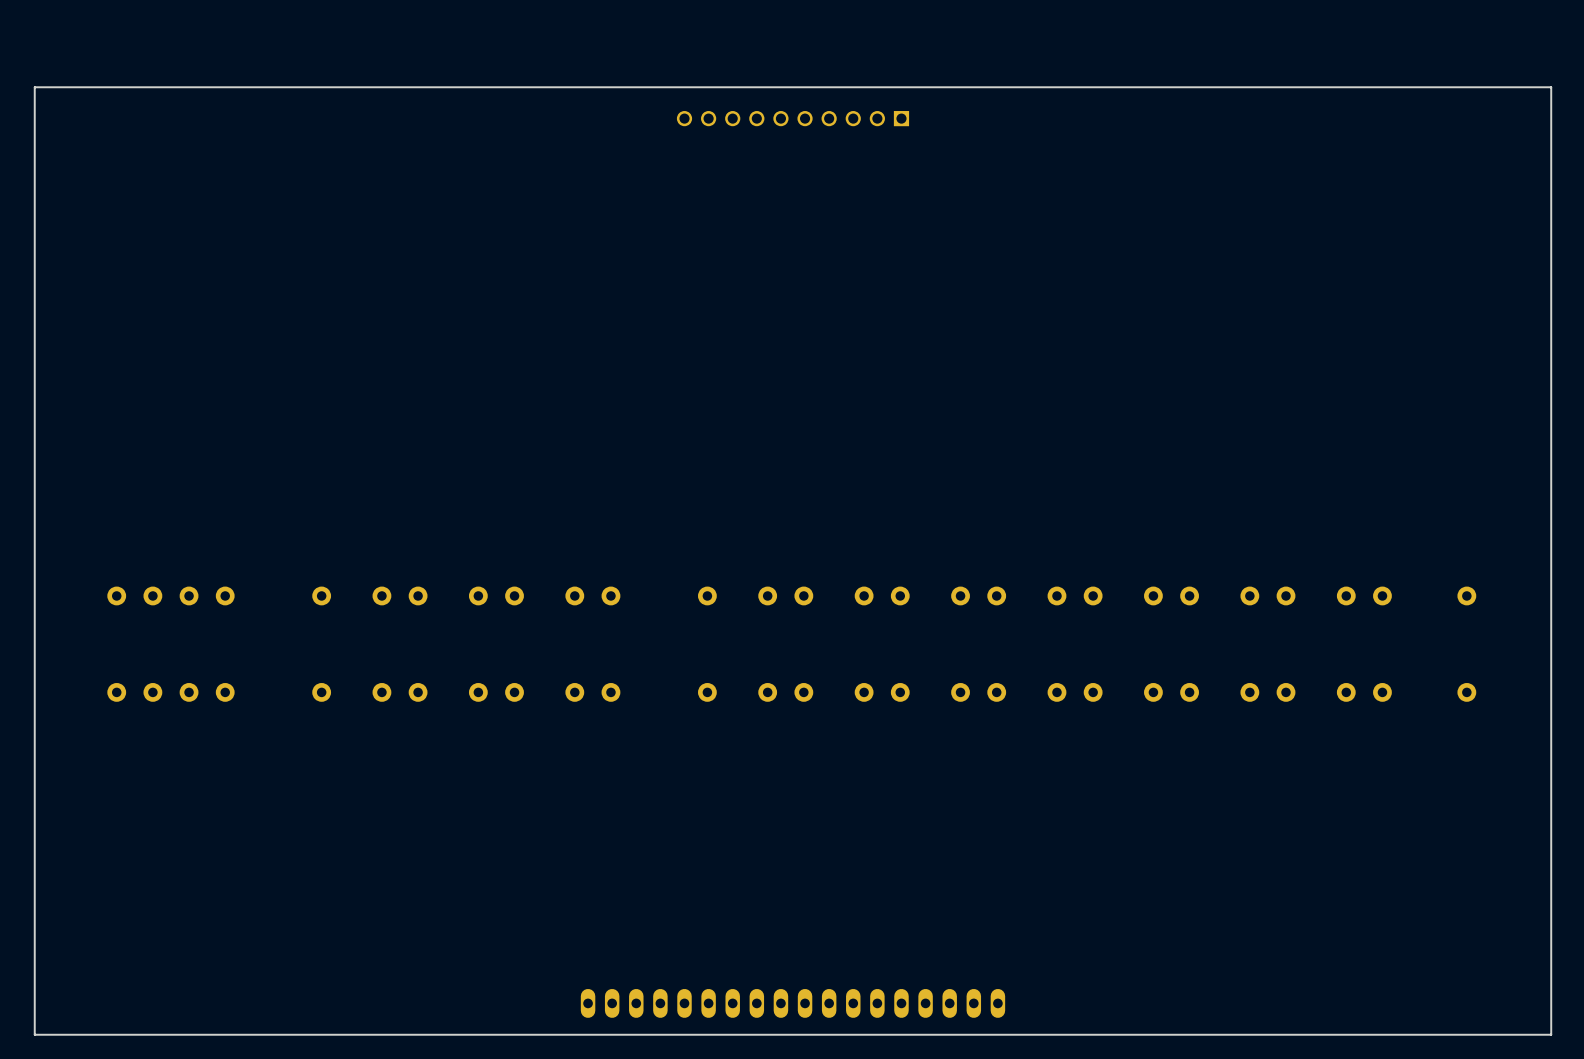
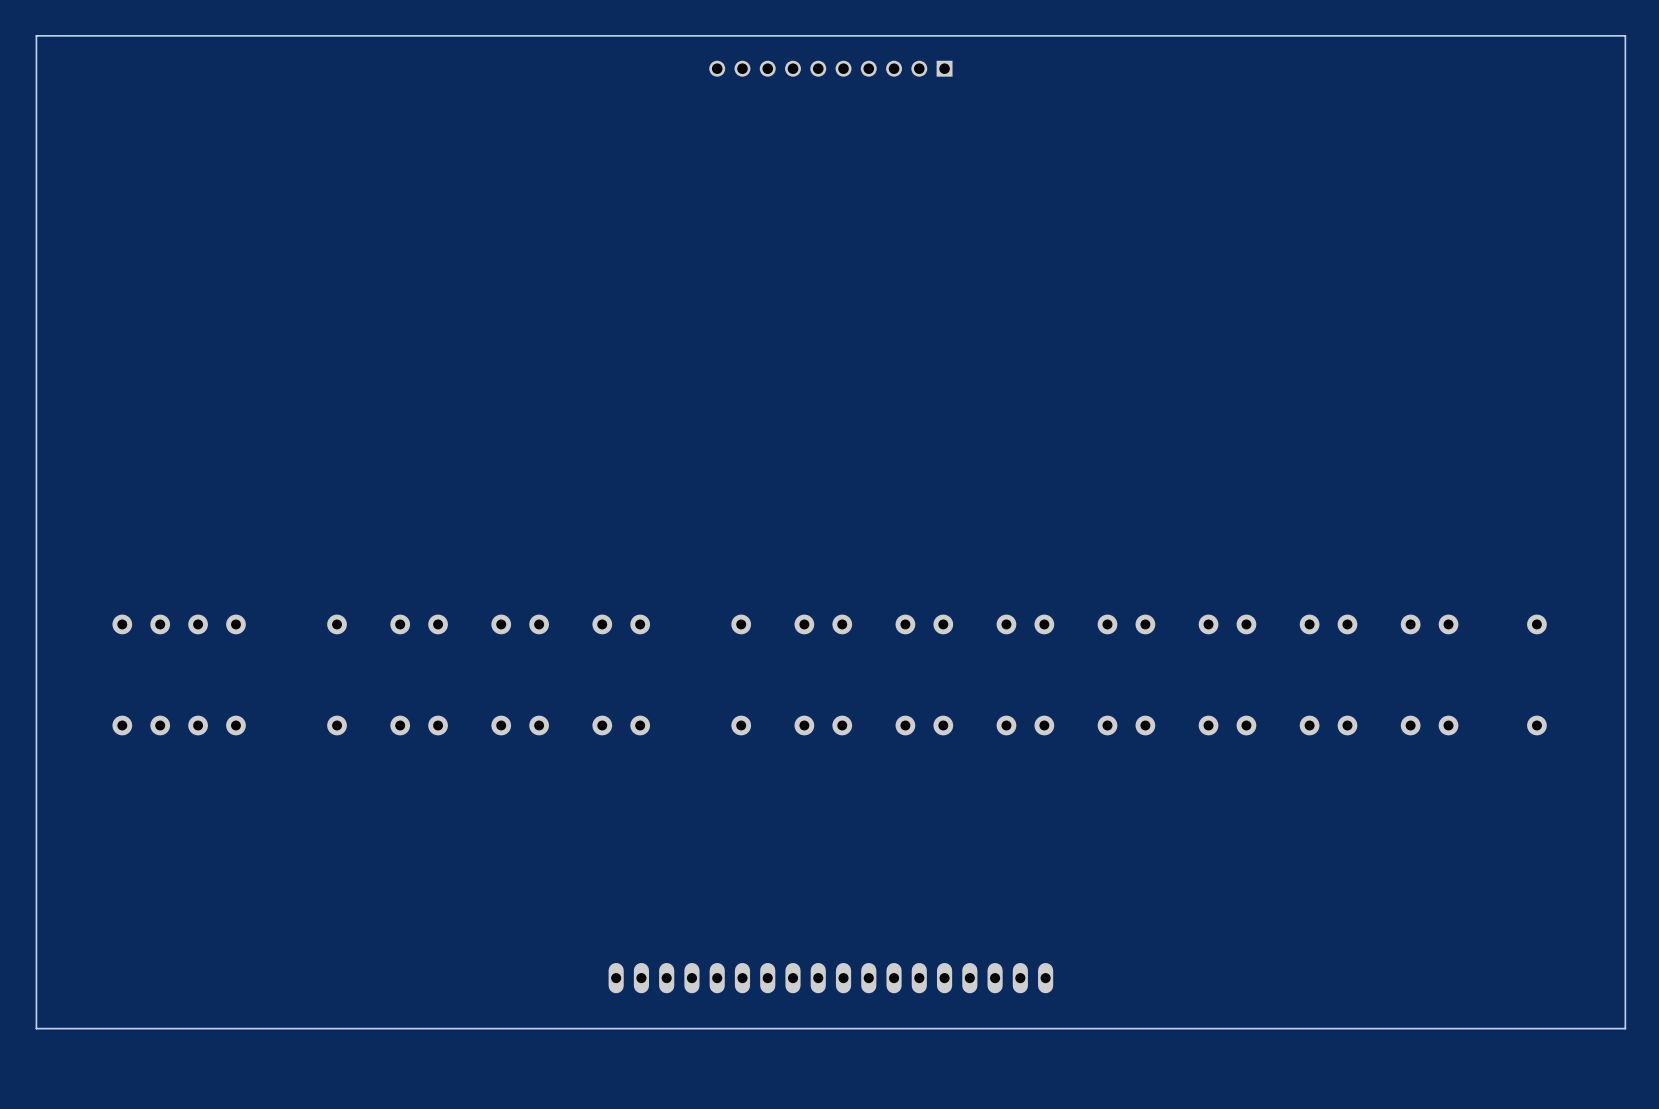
board edge: (1551, 87) (34, 87) -> (1625, 91) (1625, 35) (36, 35) (36, 91)
part position: (792, 118) -> (830, 68)
board edge: (1551, 981) (1551, 1034) (34, 1034) (34, 981) -> (1625, 1028) (36, 1028)
part position: (792, 1003) -> (830, 978)

